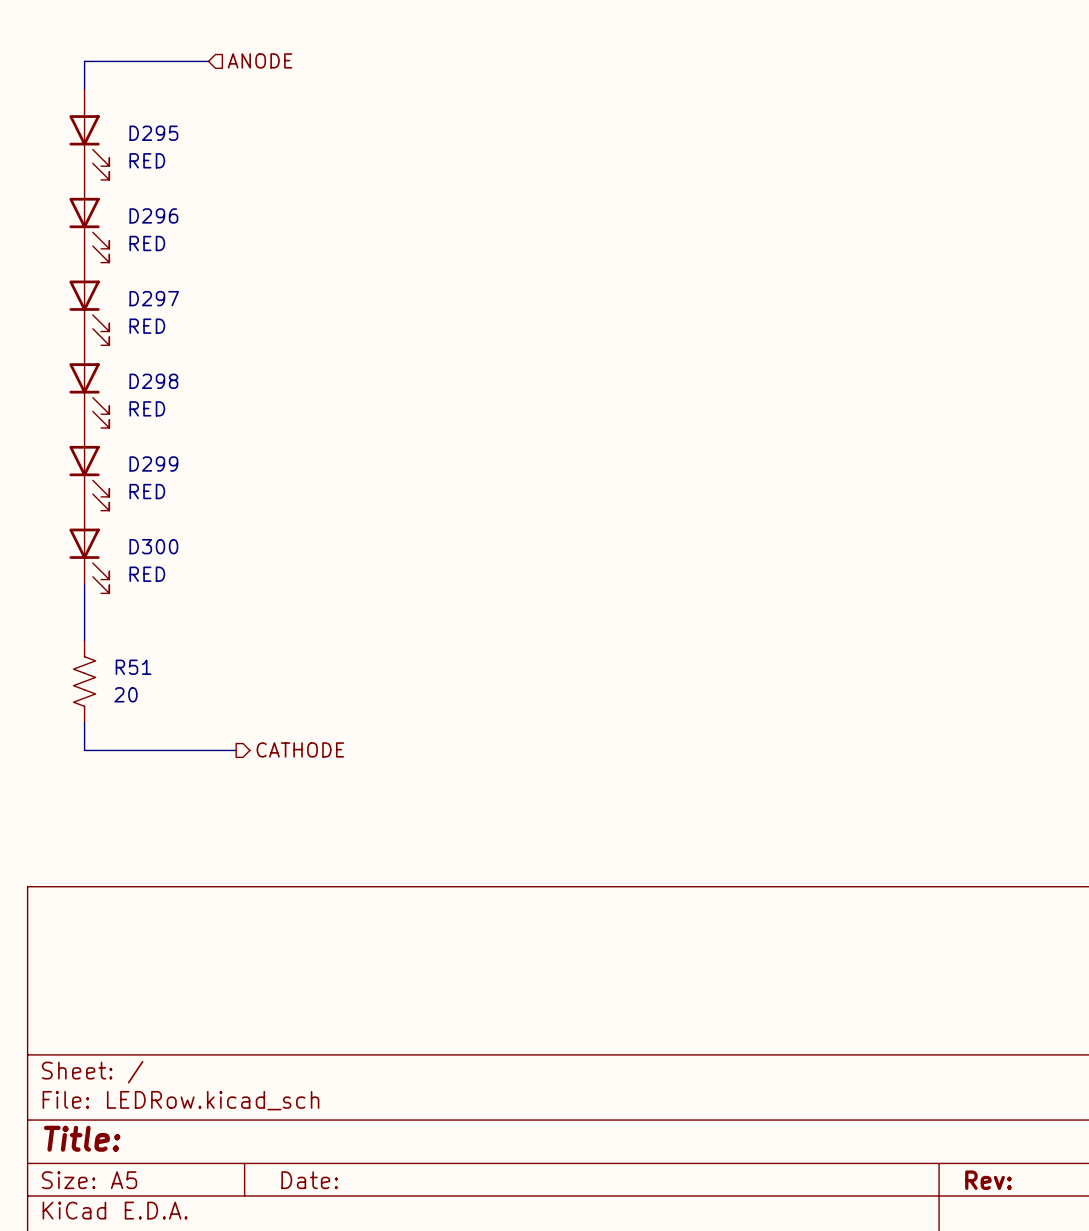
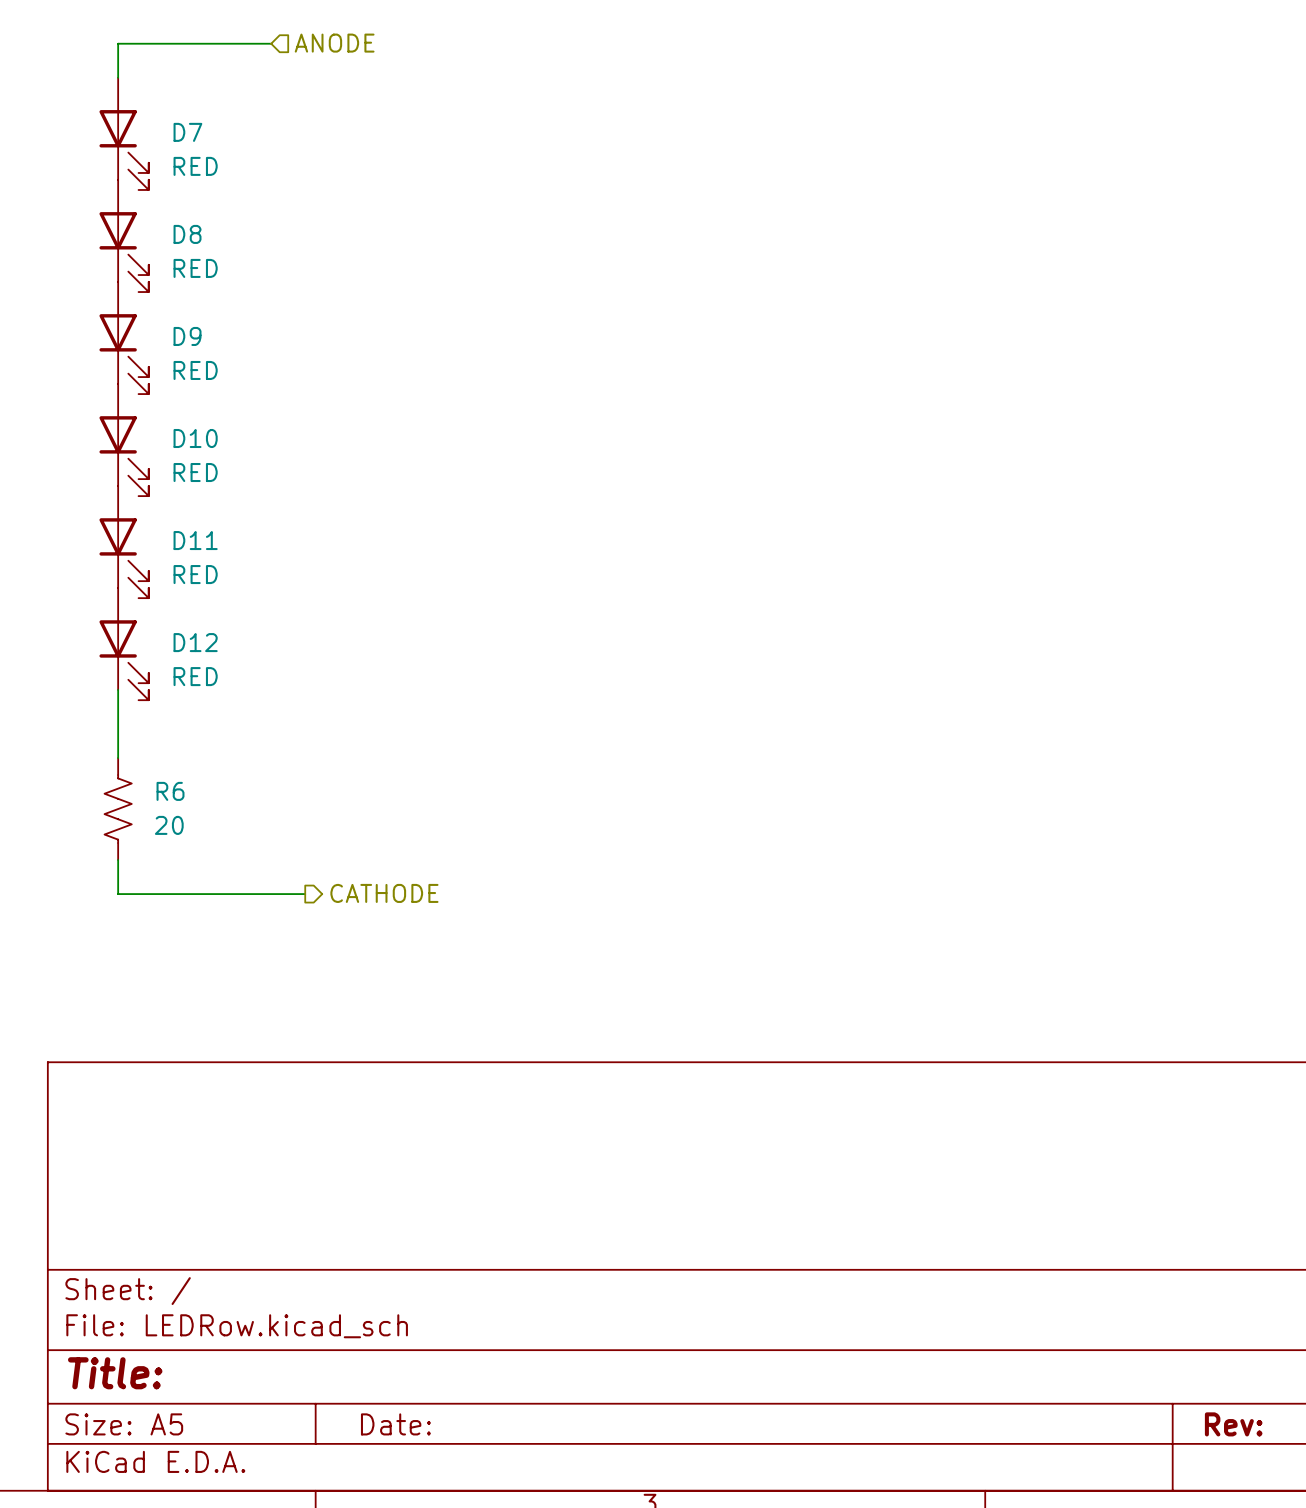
D295 name: D295 (153, 133) -> D7 (187, 132)
D296 name: D296 (153, 215) -> D8 (187, 234)
D297 name: D297 (154, 298) -> D9 (187, 336)
D298 name: D298 (153, 381) -> D10 (195, 438)
D299 name: D299 (153, 463) -> D11 (195, 540)
D300 name: D300 (153, 546) -> D12 (195, 642)
R51 name: R51 (133, 667) -> R6 (170, 791)

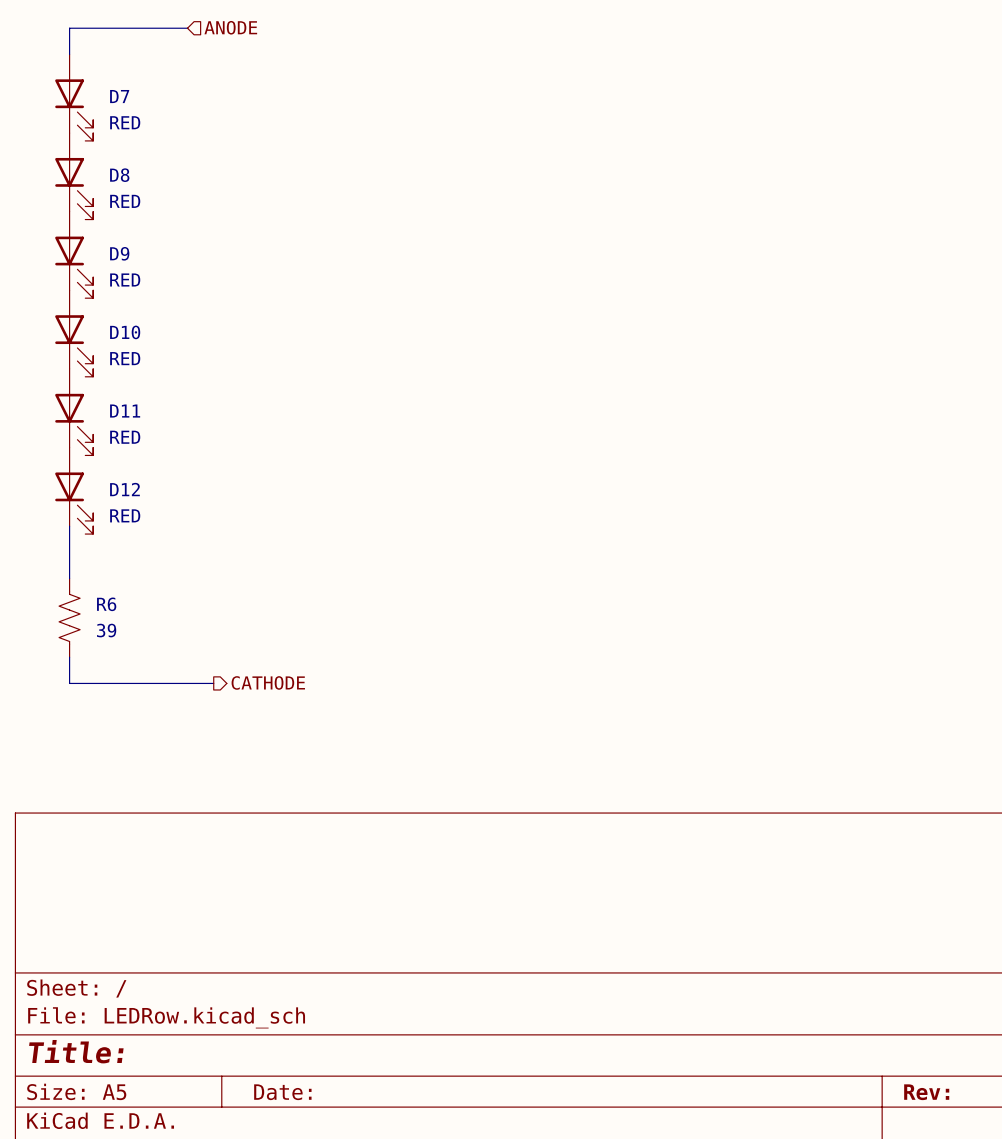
R6 value: 20 (169, 825) -> 39 (106, 630)

